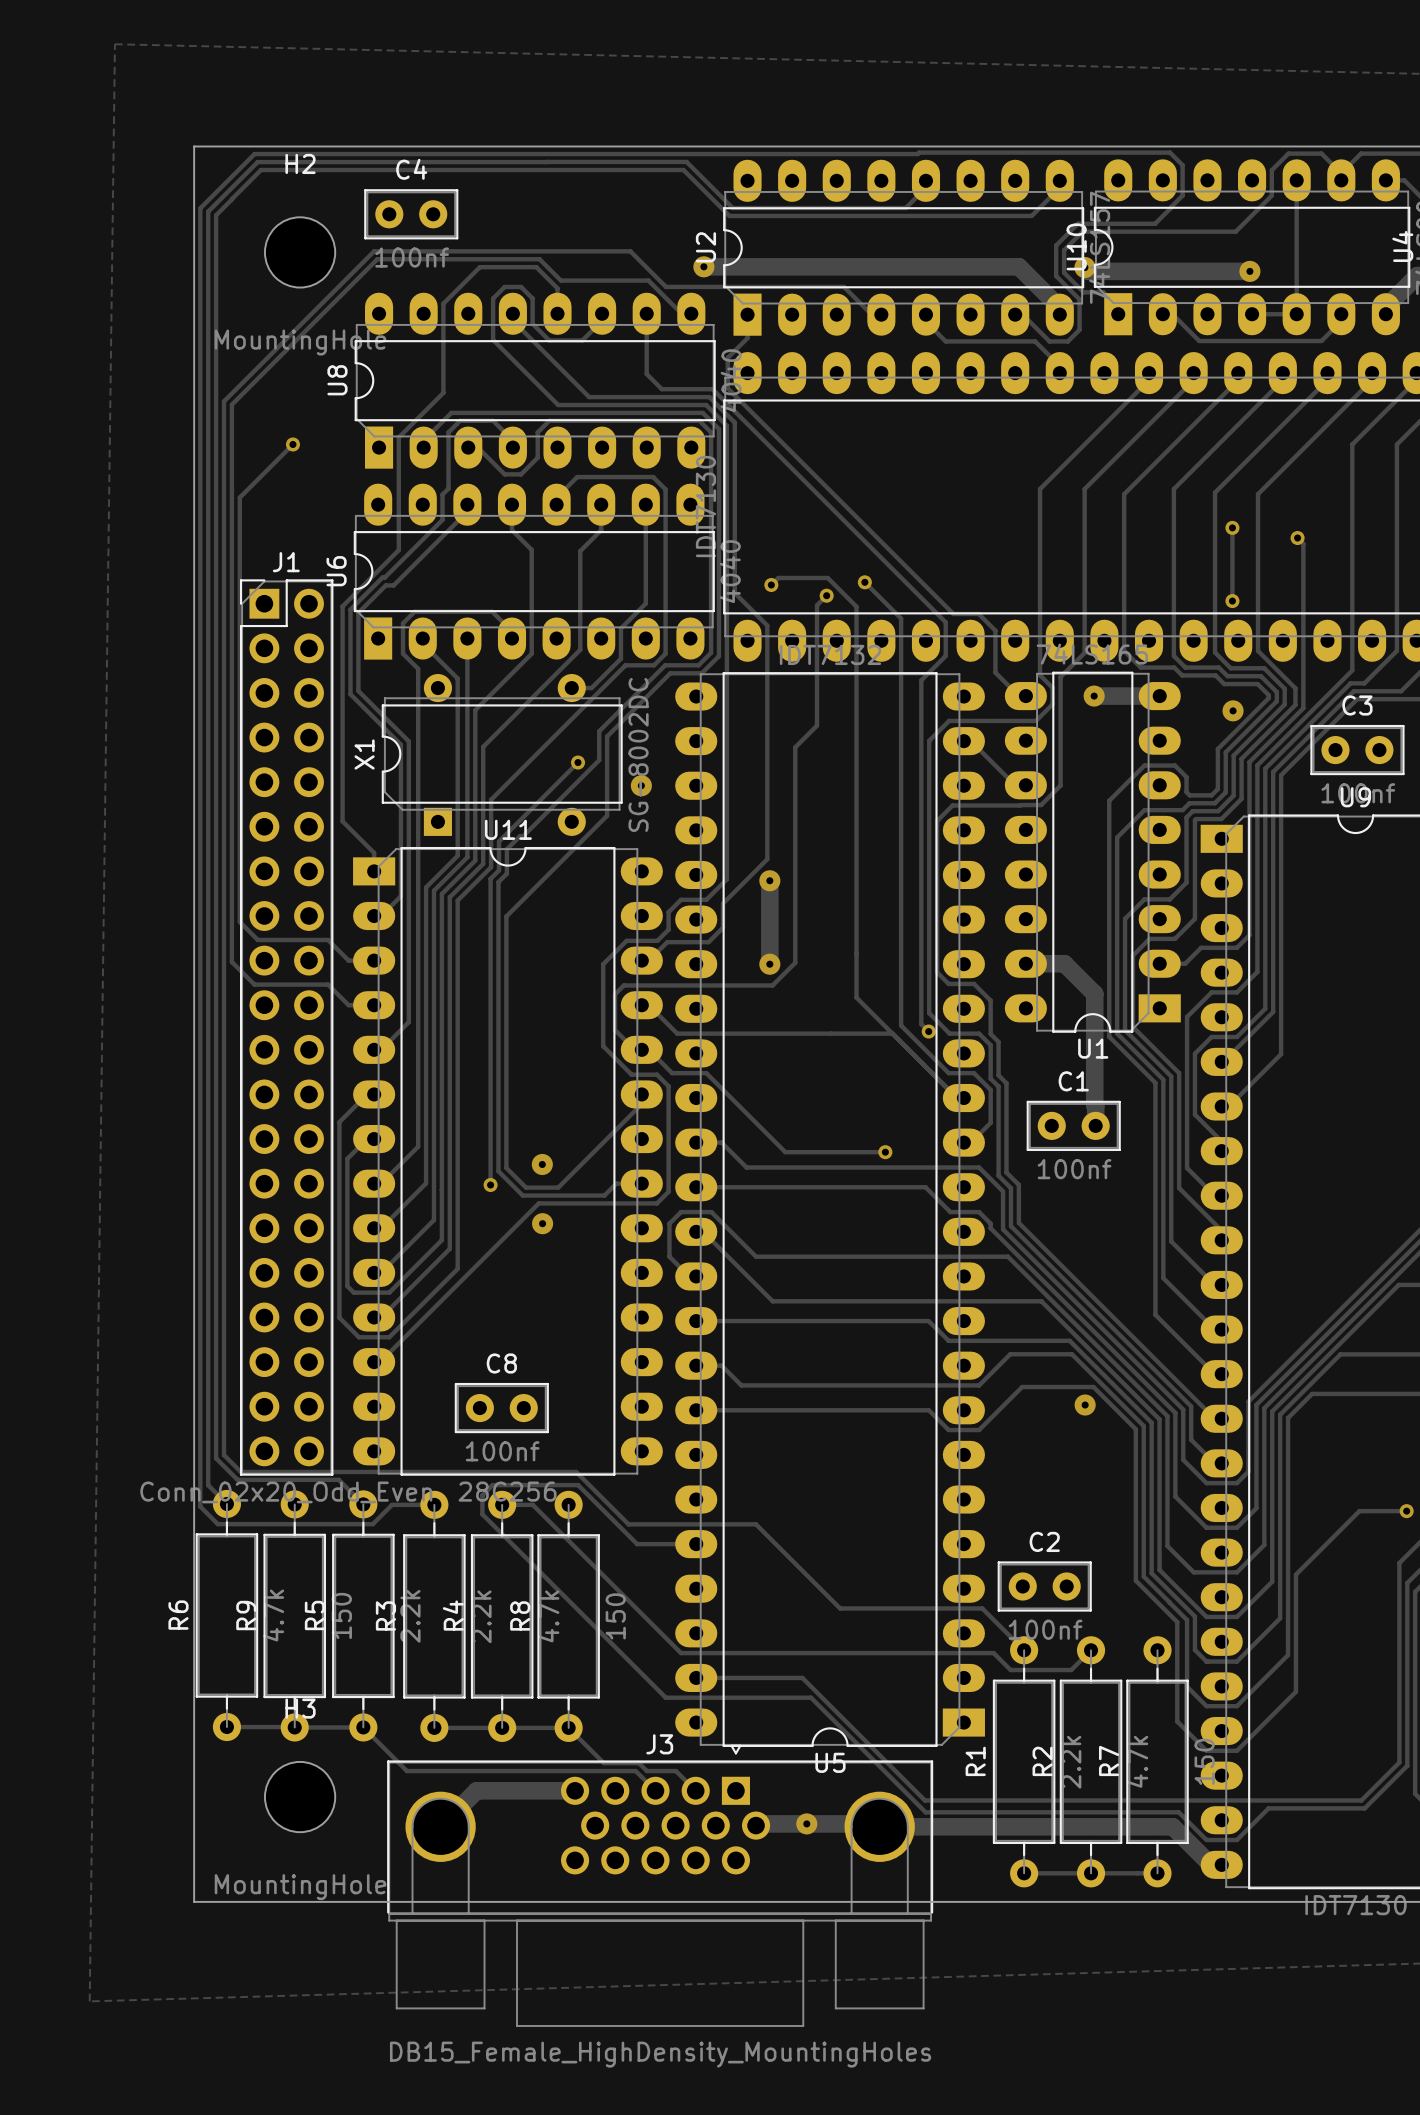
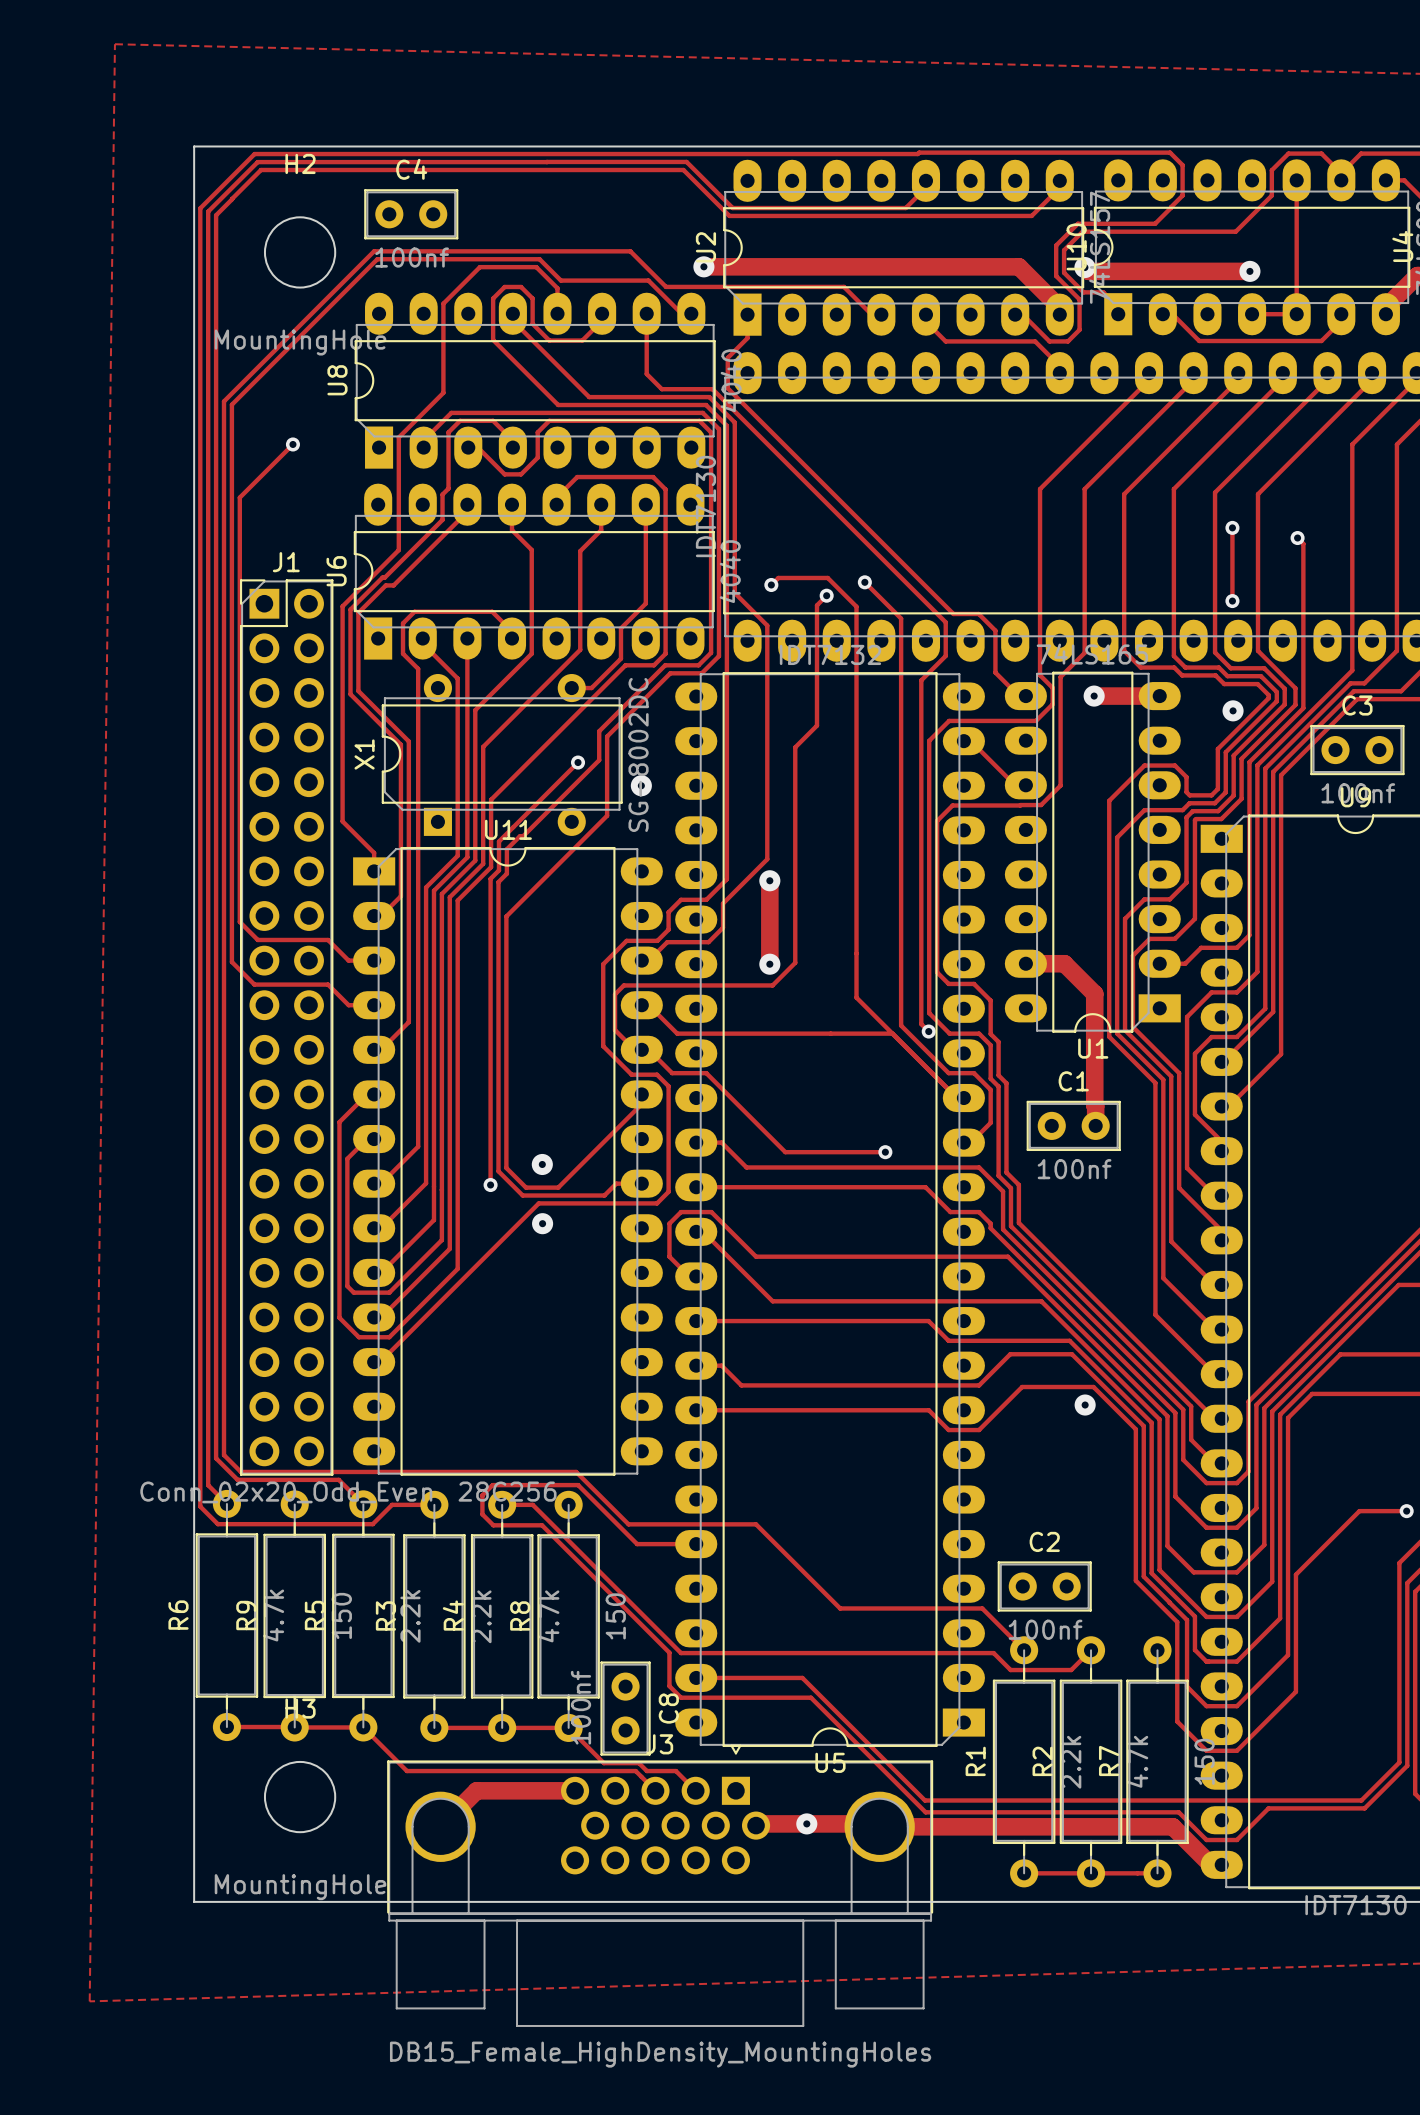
C8 rotation: 0° (501, 1408) -> 90° clockwise (625, 1708)
C8 position: (501, 1408) -> (625, 1708)
track: (493, 1525) (665, 1697) (681, 1697) -> (493, 1525) (542, 1525) (669, 1652) (669, 1686) (681, 1697)

